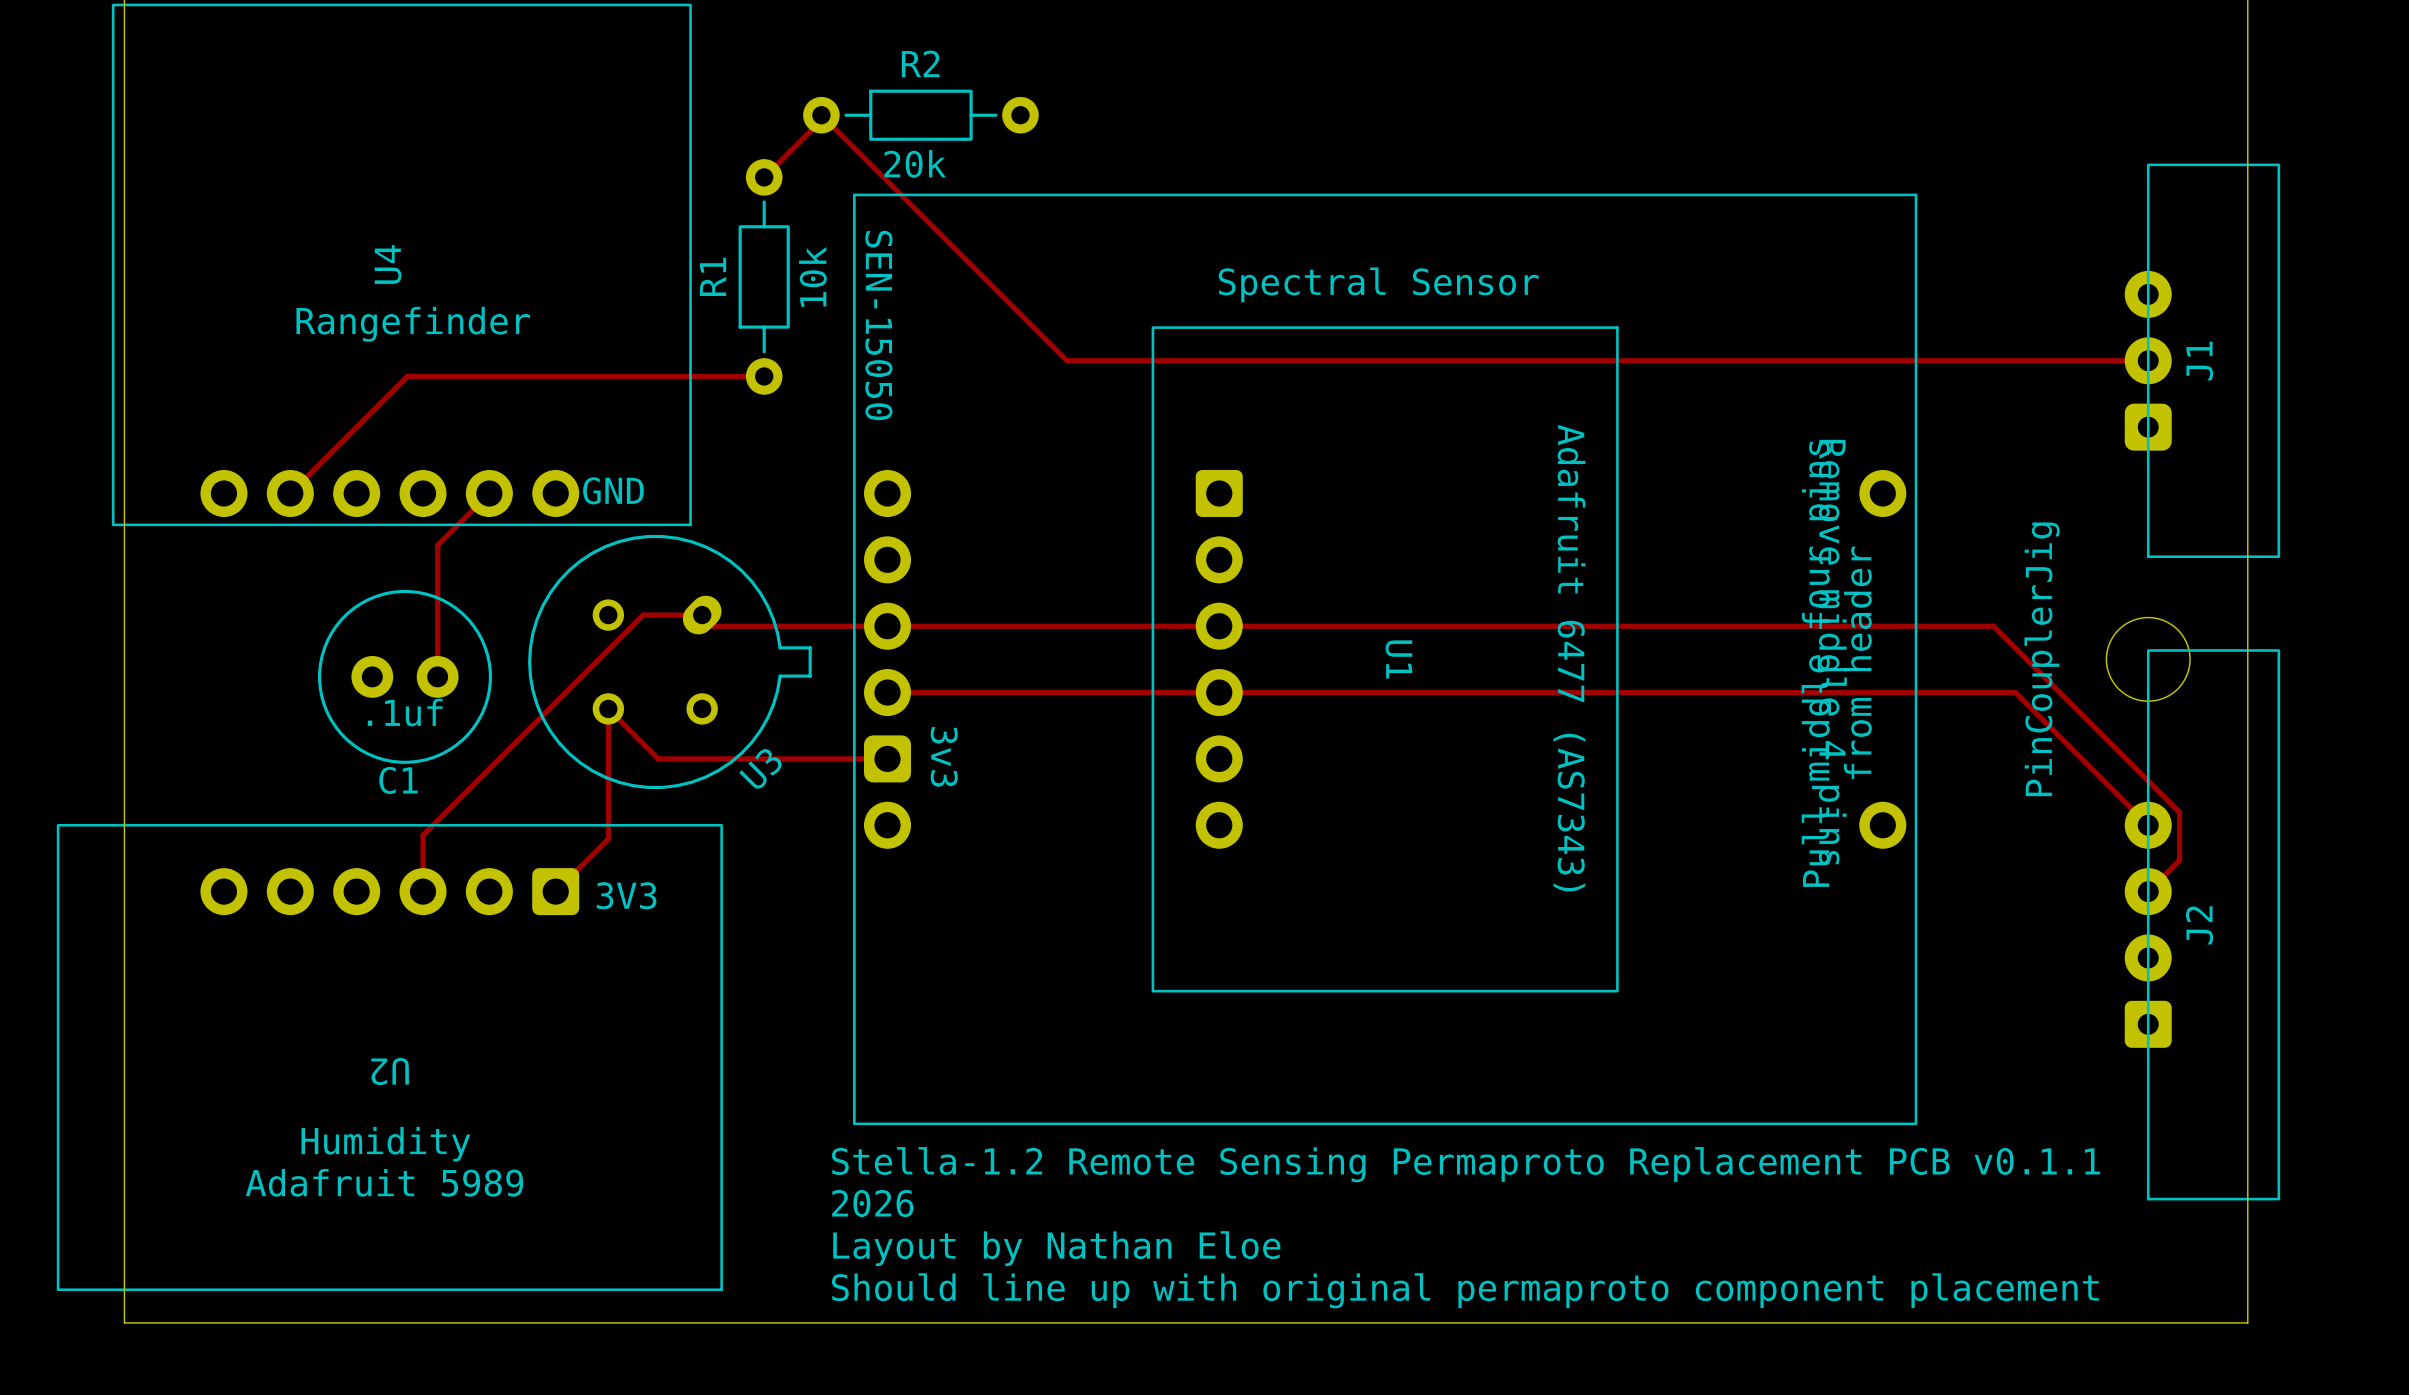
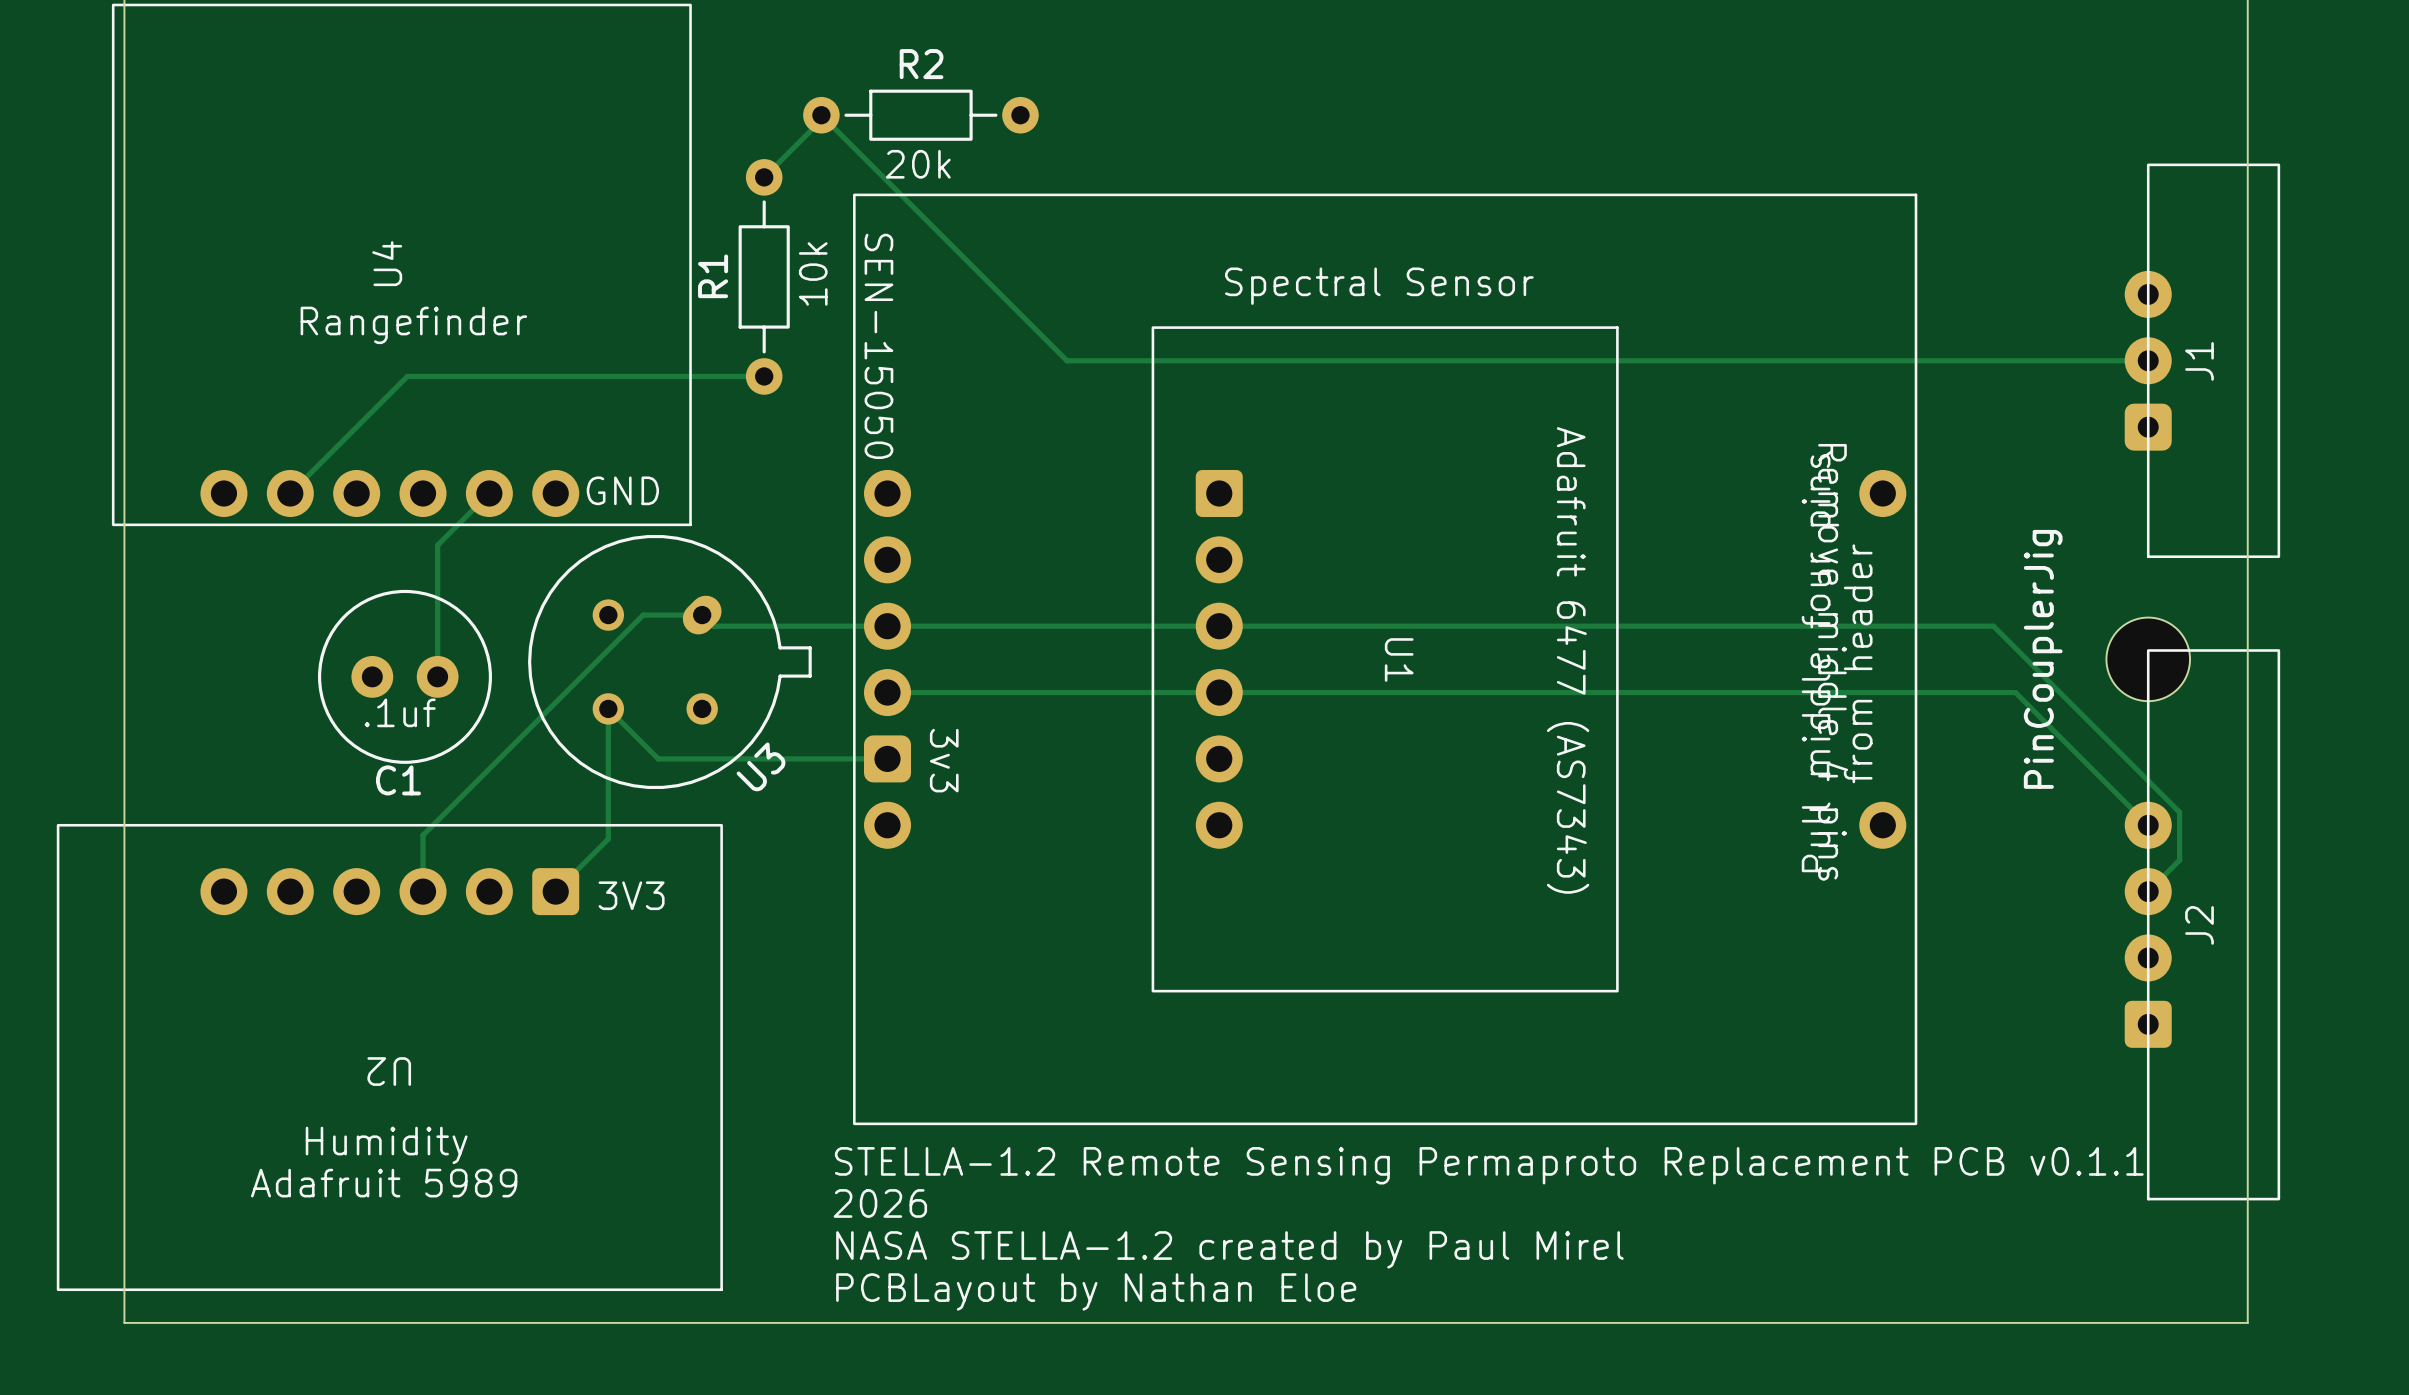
text: Stella-1.2 Remote Sensing Permaproto Replacement PCB v0.1.1 (1465, 1164) -> STELLA-1.2 Remote Sensing Permaproto Replacement PCB v0.1.1 (1489, 1165)
text: Layout by Nathan Eloe (1056, 1248) -> NASA STELLA-1.2 created by Paul Mirel (1229, 1249)
text: Should line up with original permaproto component placement (1465, 1290) -> PCBLayout by Nathan Eloe (1096, 1291)

